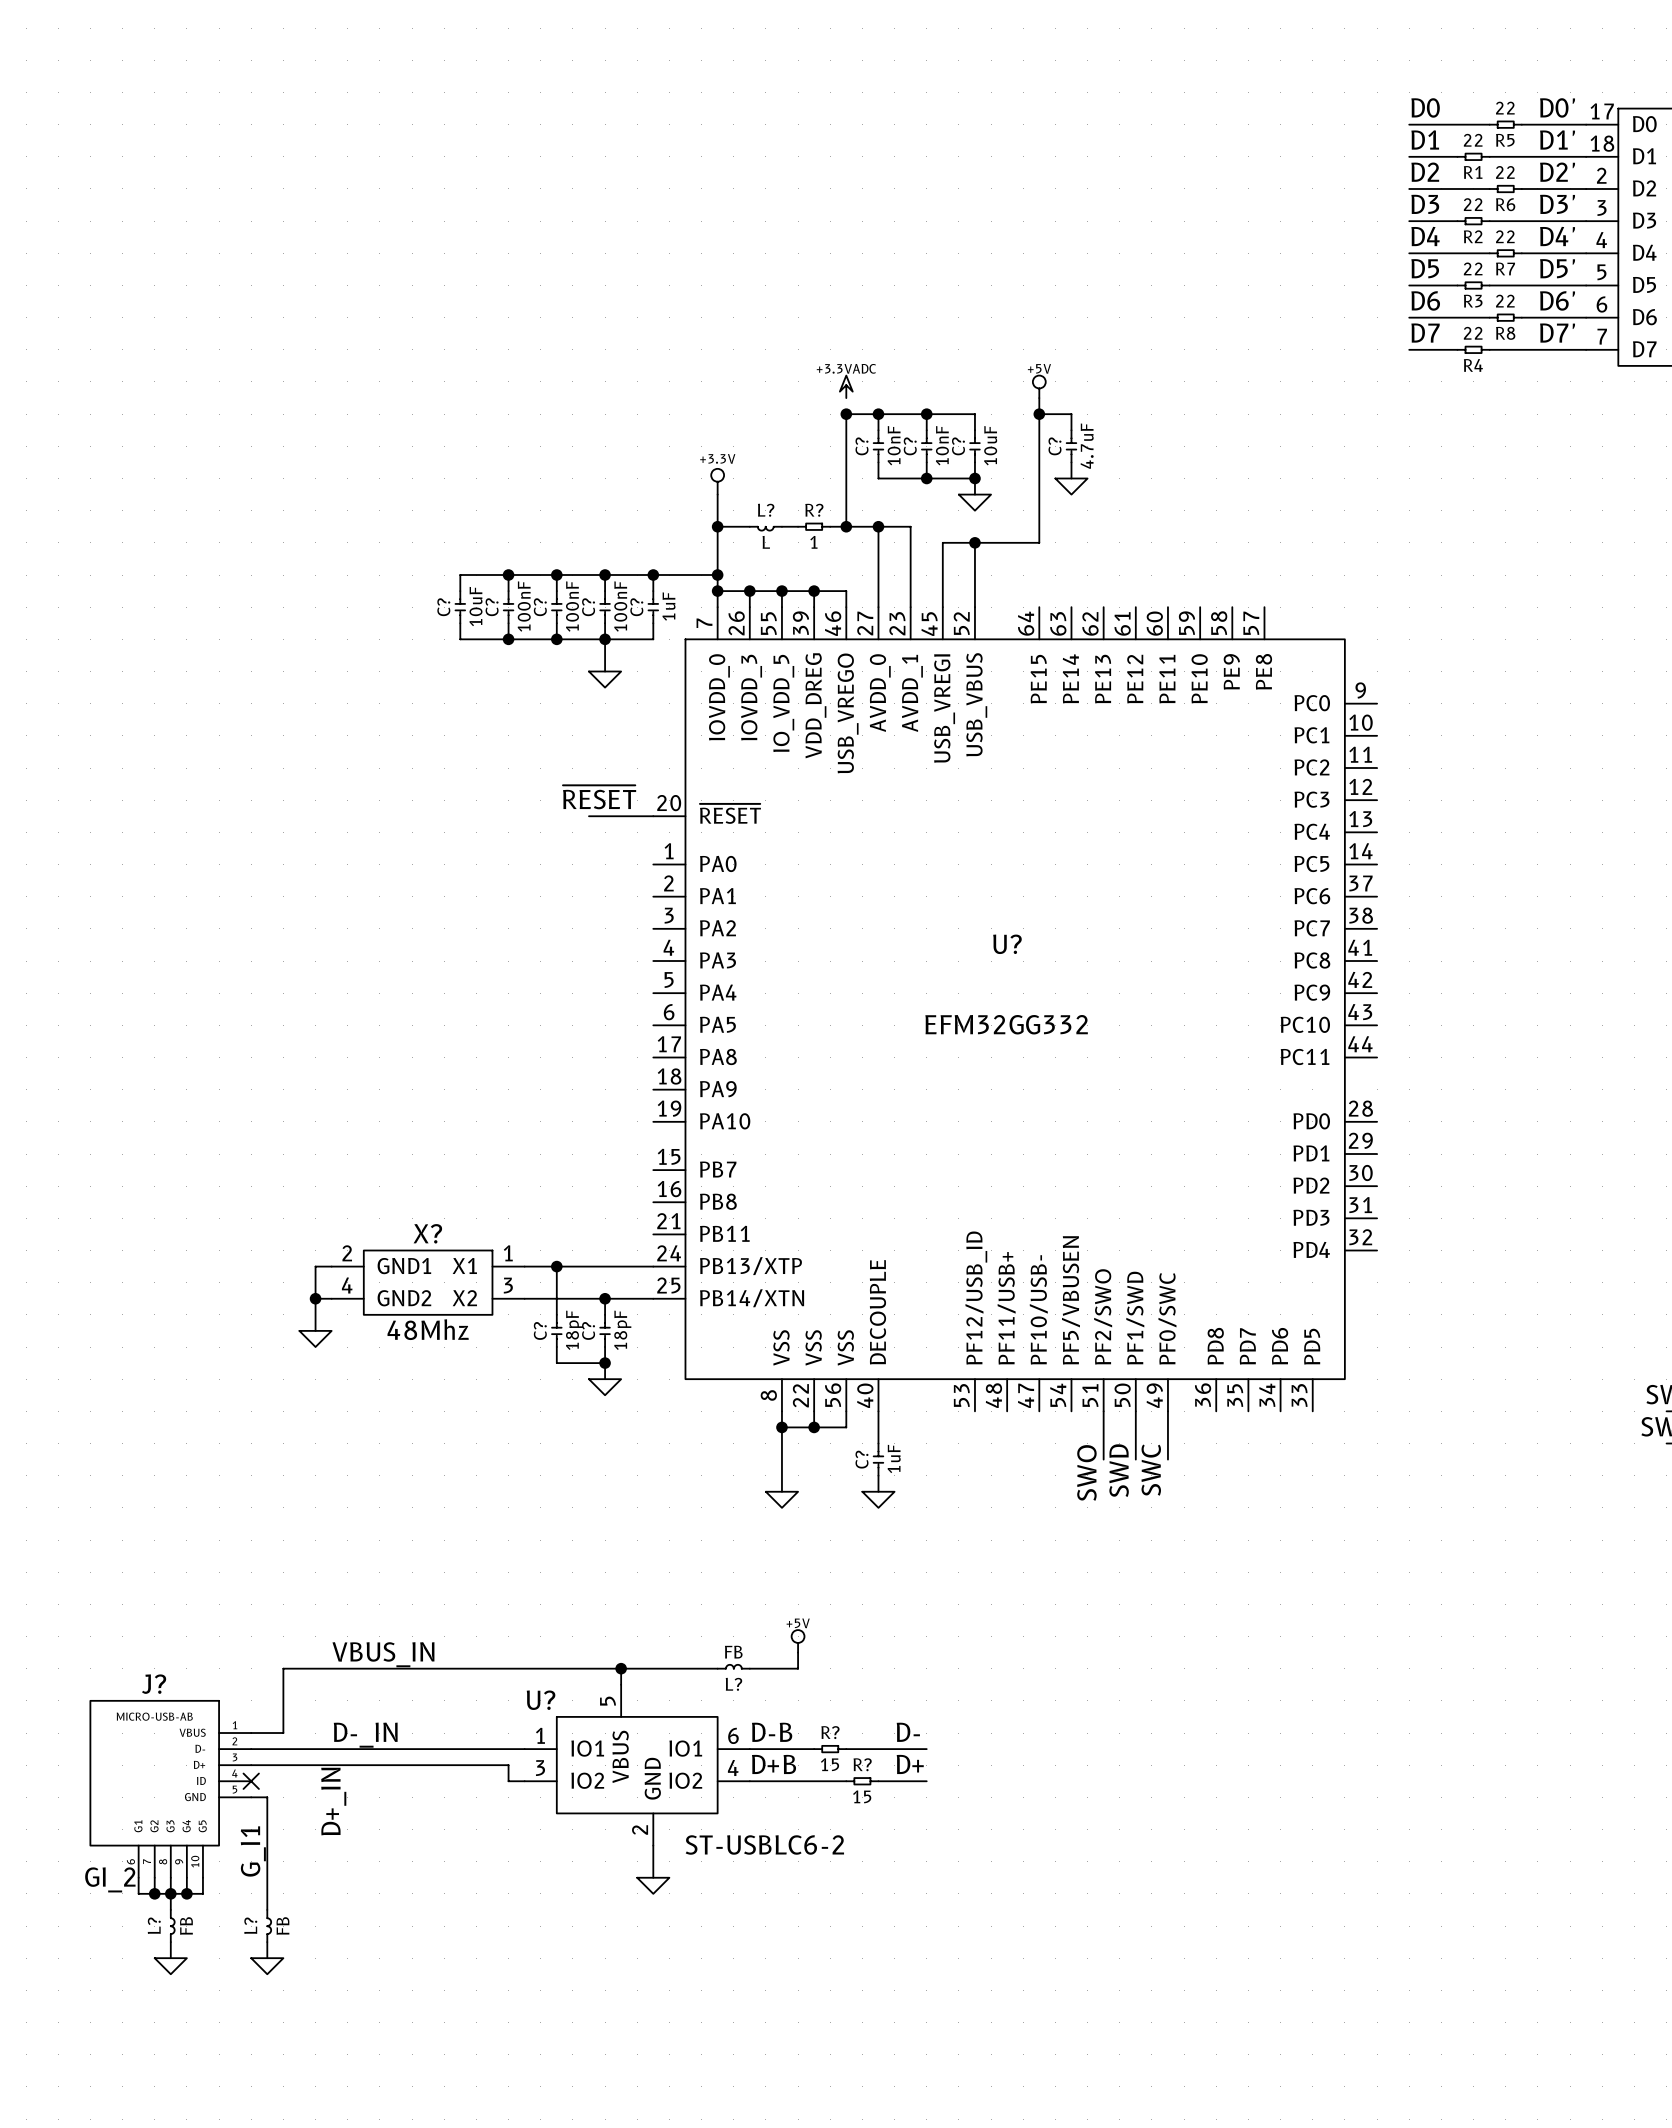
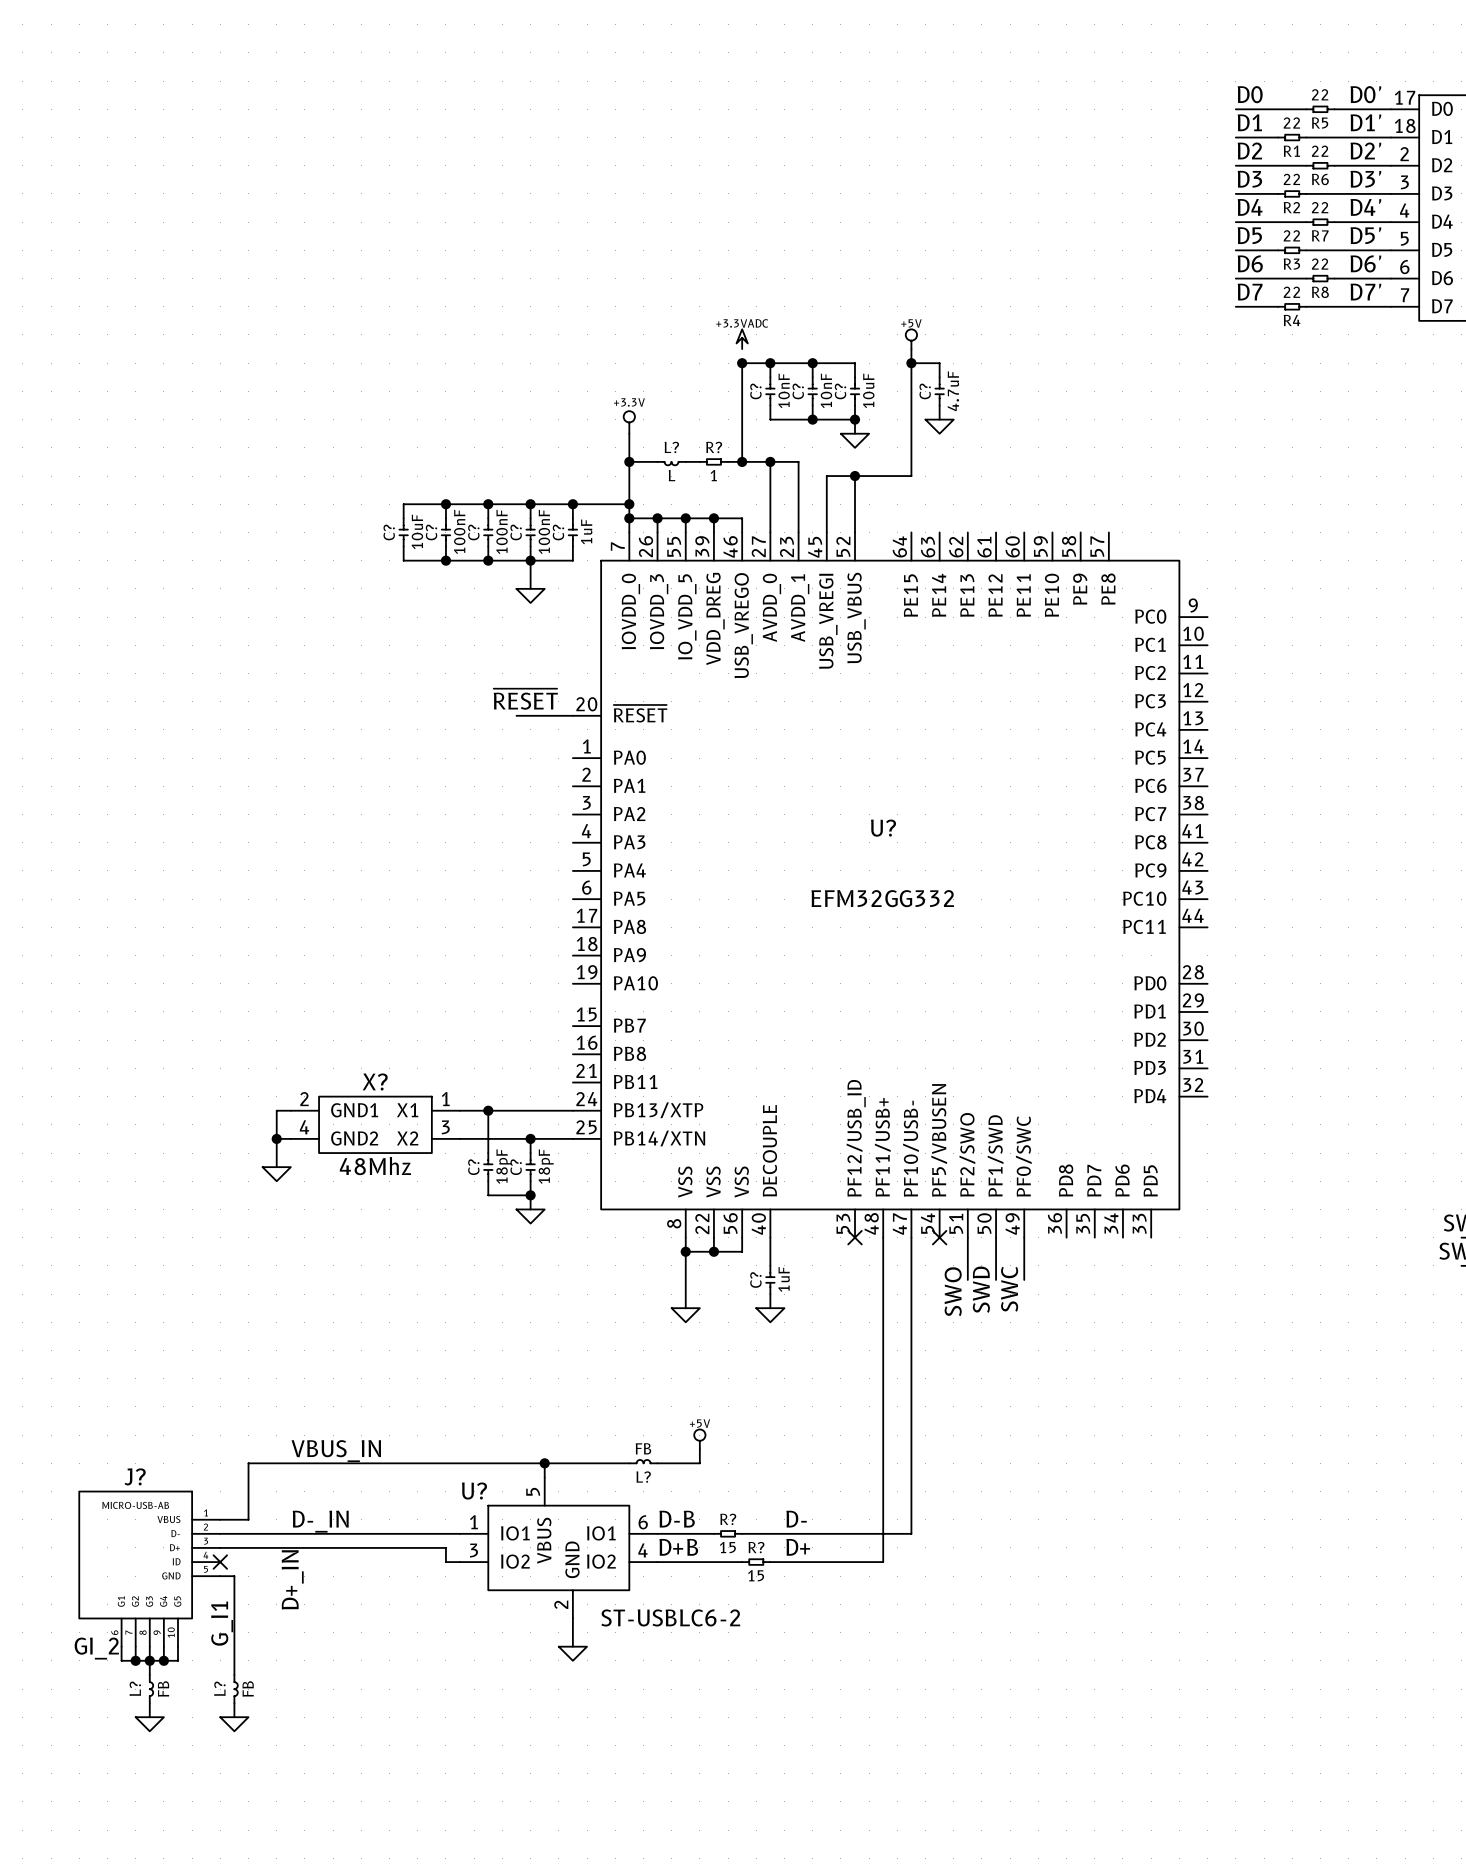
no-connect mark: none -> (855, 1237)
wire: none -> (883, 1237) (883, 1562) (812, 1562)
wire: none -> (911, 1237) (911, 1533) (812, 1533)
no-connect mark: none -> (939, 1237)

